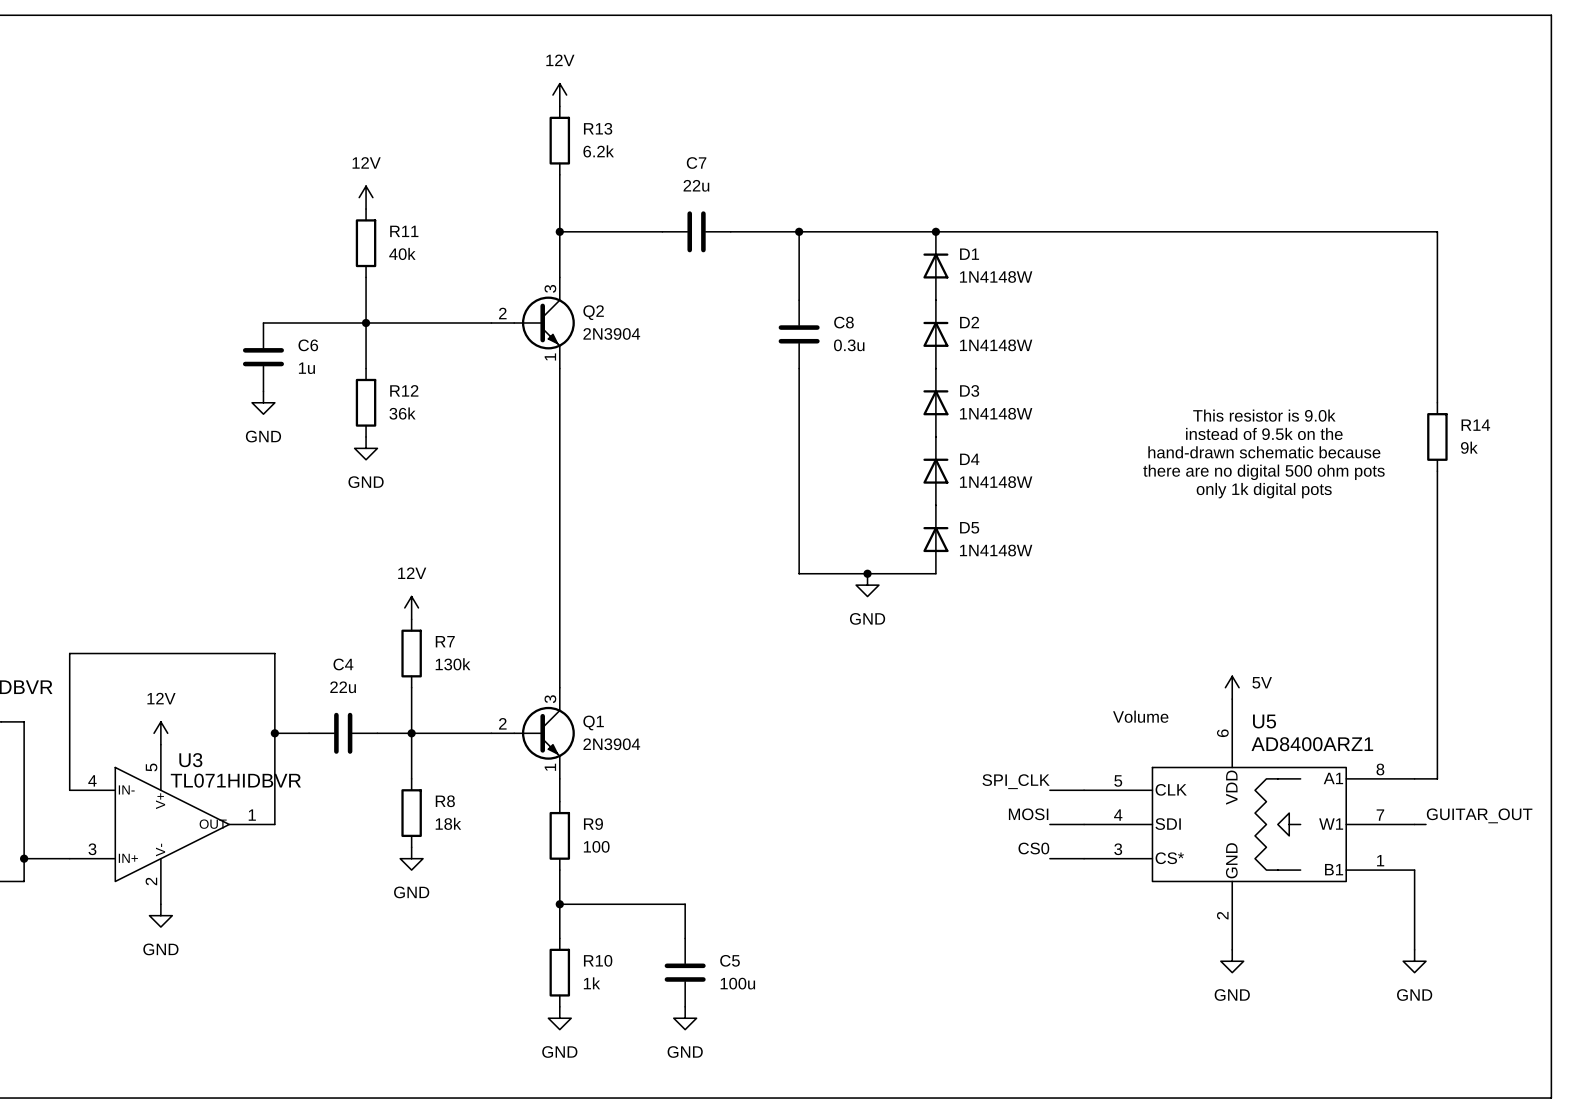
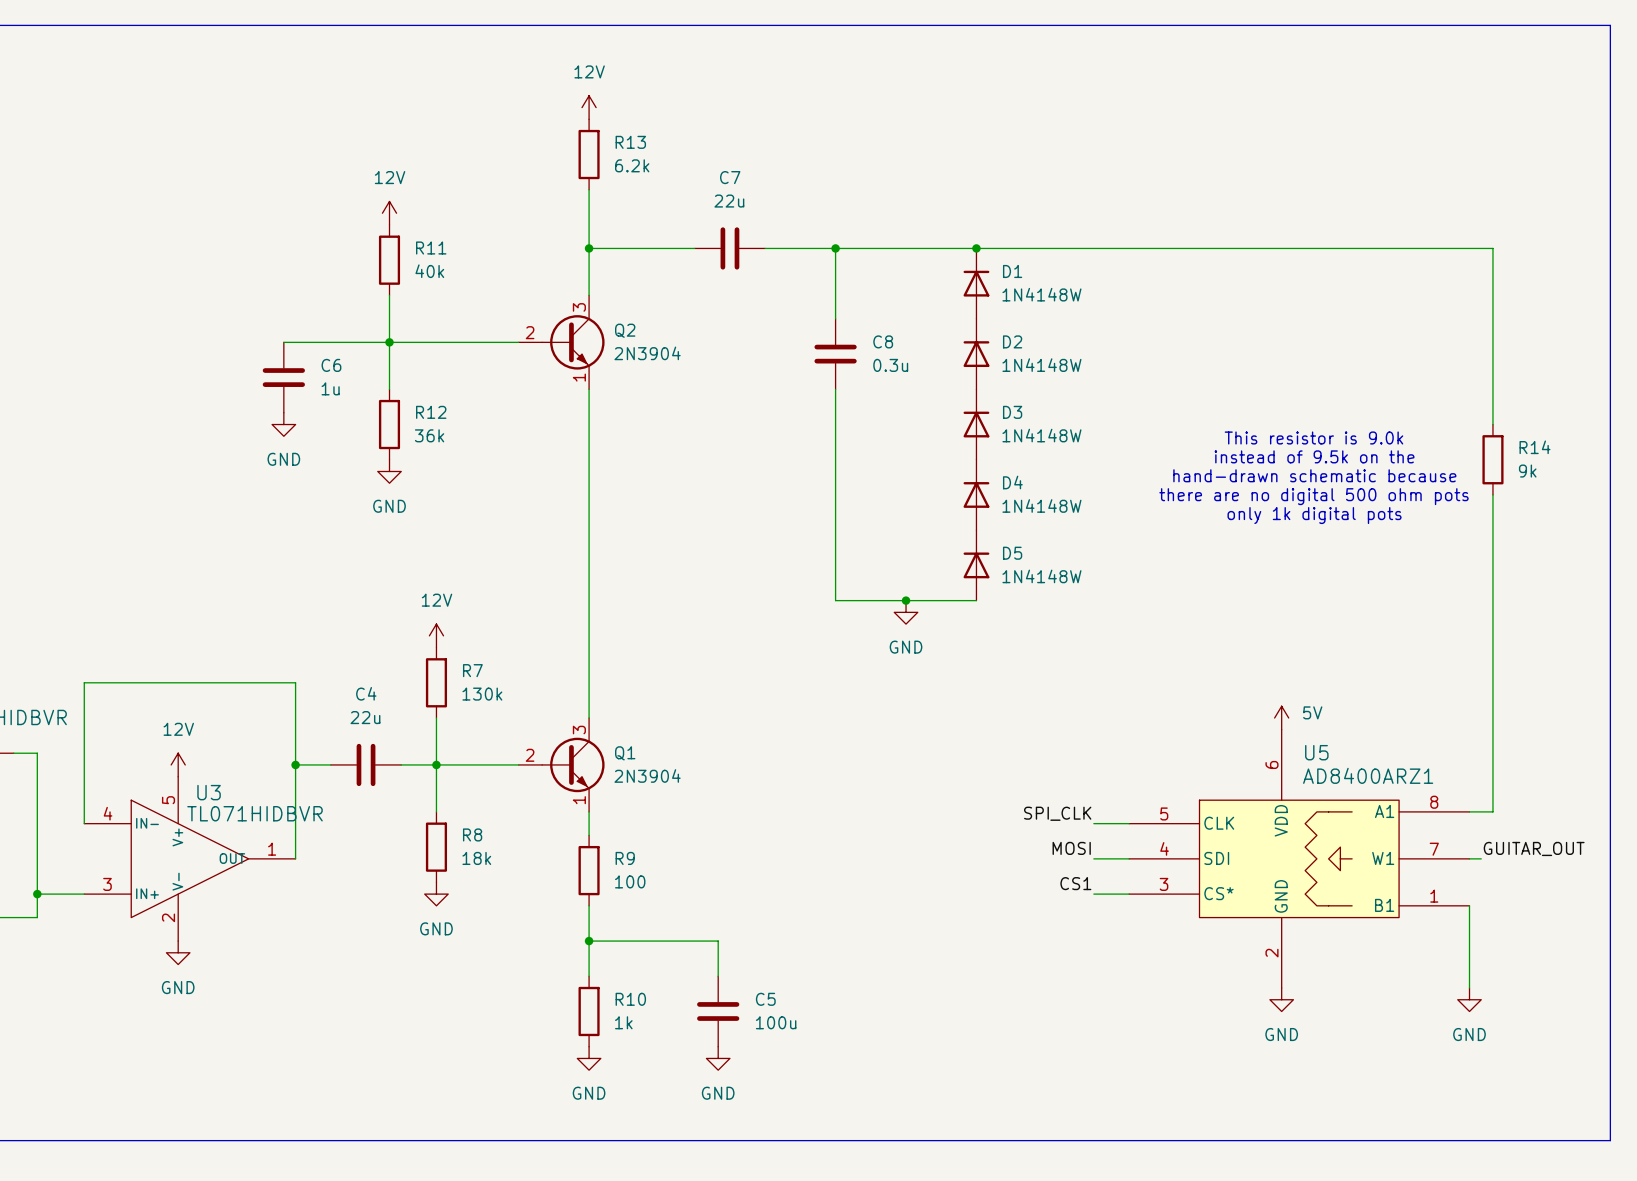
text: Volume (1140, 716) -> none
label: CS0 (1033, 848) -> CS1 (1075, 883)

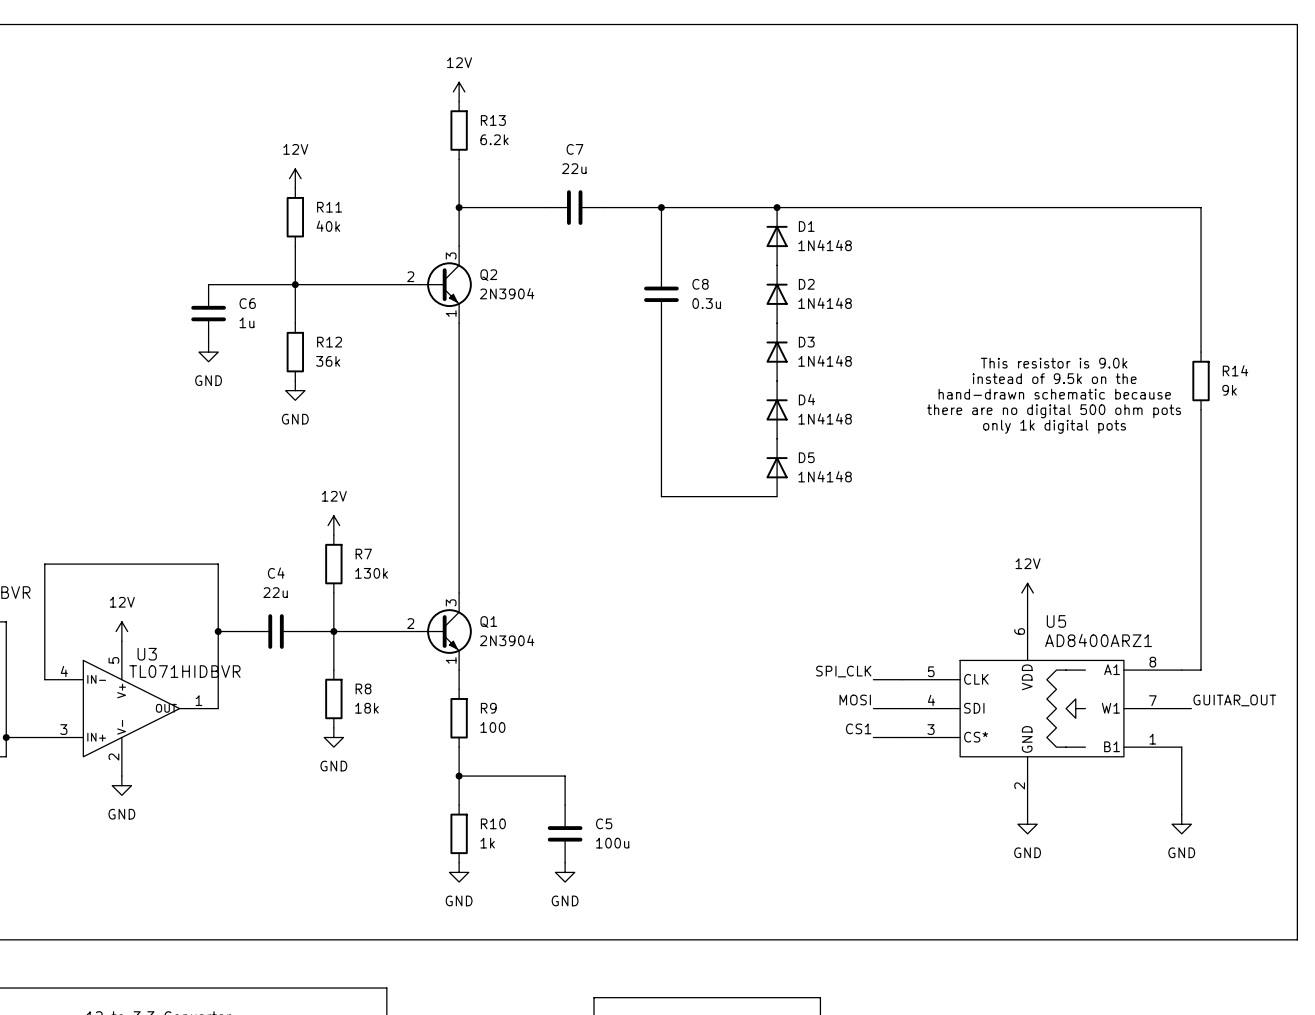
D1 value: 1N4148W (1041, 294) -> 1N4148 (825, 245)
D2 value: 1N4148W (1041, 365) -> 1N4148 (825, 303)
D3 value: 1N4148W (1041, 435) -> 1N4148 (825, 361)
D4 value: 1N4148W (1041, 505) -> 1N4148 (825, 418)
D5 value: 1N4148W (1041, 576) -> 1N4148 (825, 476)
junction: (906, 600) -> none
power symbol: GND (906, 612) -> none
power symbol: 5V (1281, 718) -> 12V (1027, 592)

